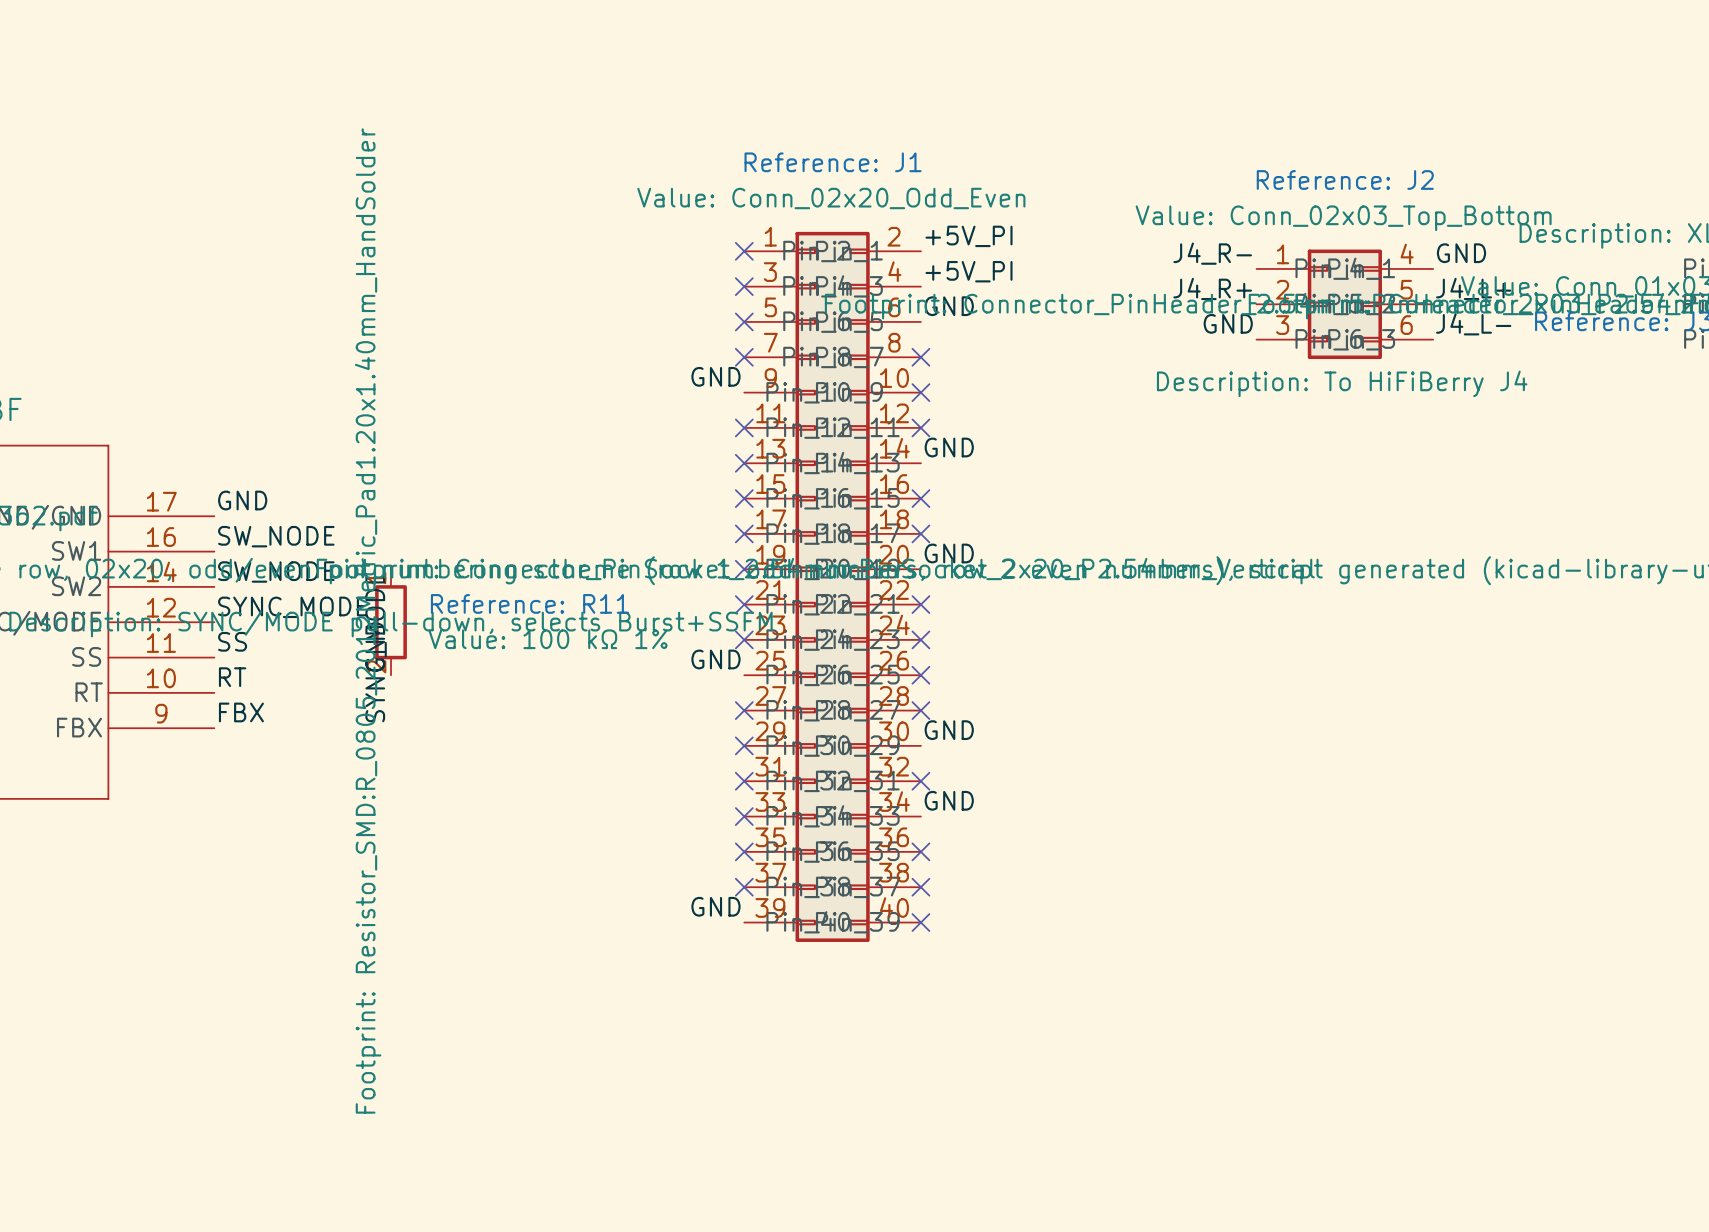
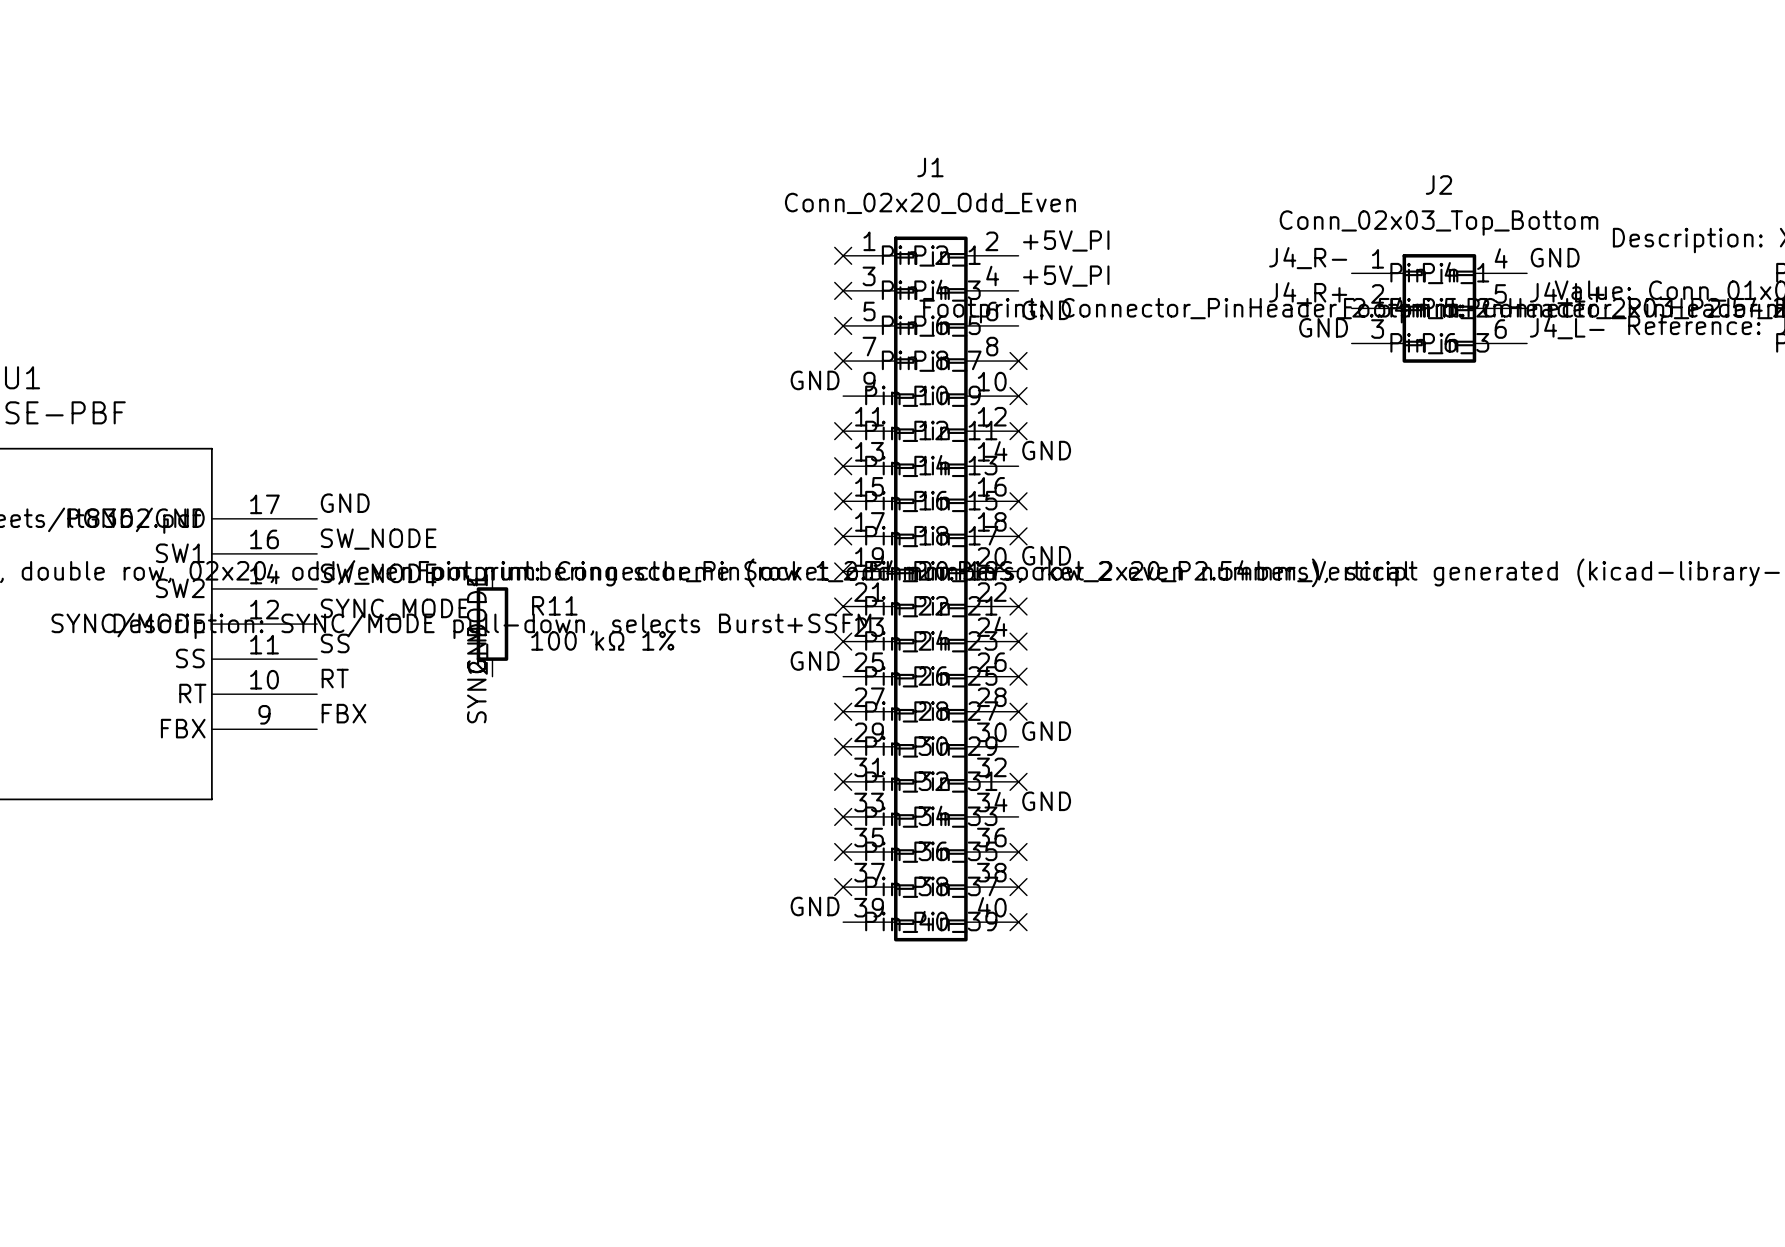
J1 name: Reference: J1 (833, 162) -> J1 (930, 167)
J2 name: Reference: J2 (1345, 179) -> J2 (1438, 185)
J1 value: Value: Conn_02x20_Odd_Even (831, 198) -> Conn_02x20_Odd_Even (930, 203)
J2 value: Value: Conn_02x03_Top_Bottom (1343, 218) -> Conn_02x03_Top_Bottom (1438, 223)
J2 text: Description: To HiFiBerry J4 (1342, 383) -> none
R11 name: Reference: R11 (529, 603) -> R11 (554, 605)
R11 text: Footprint: Resistor_SMD:R_0805_2012Metric_Pad1.20x1.40mm_HandSolder (368, 620) -> none
R11 value: Value: 100 kΩ 1% (548, 639) -> 100 kΩ 1% (602, 640)

